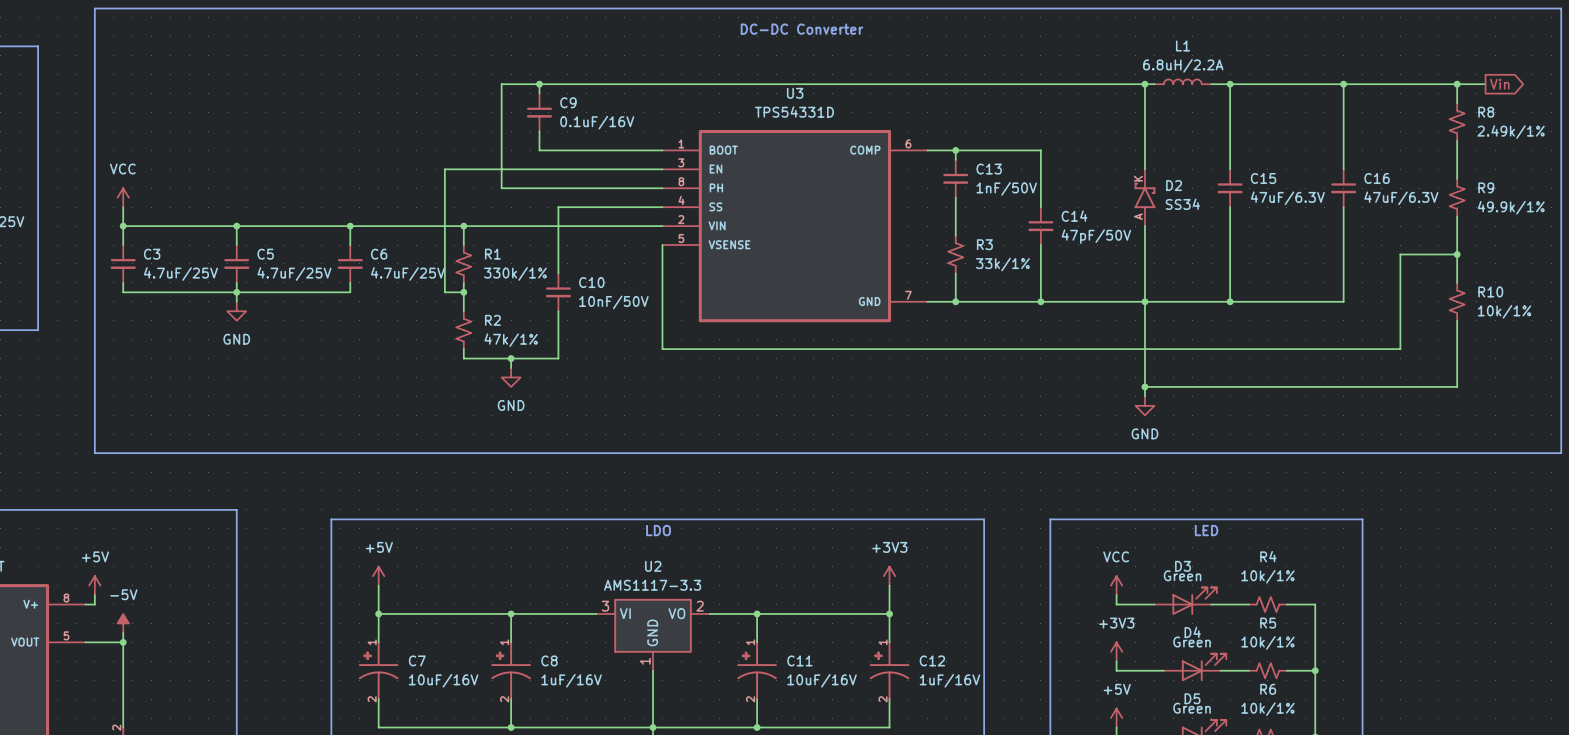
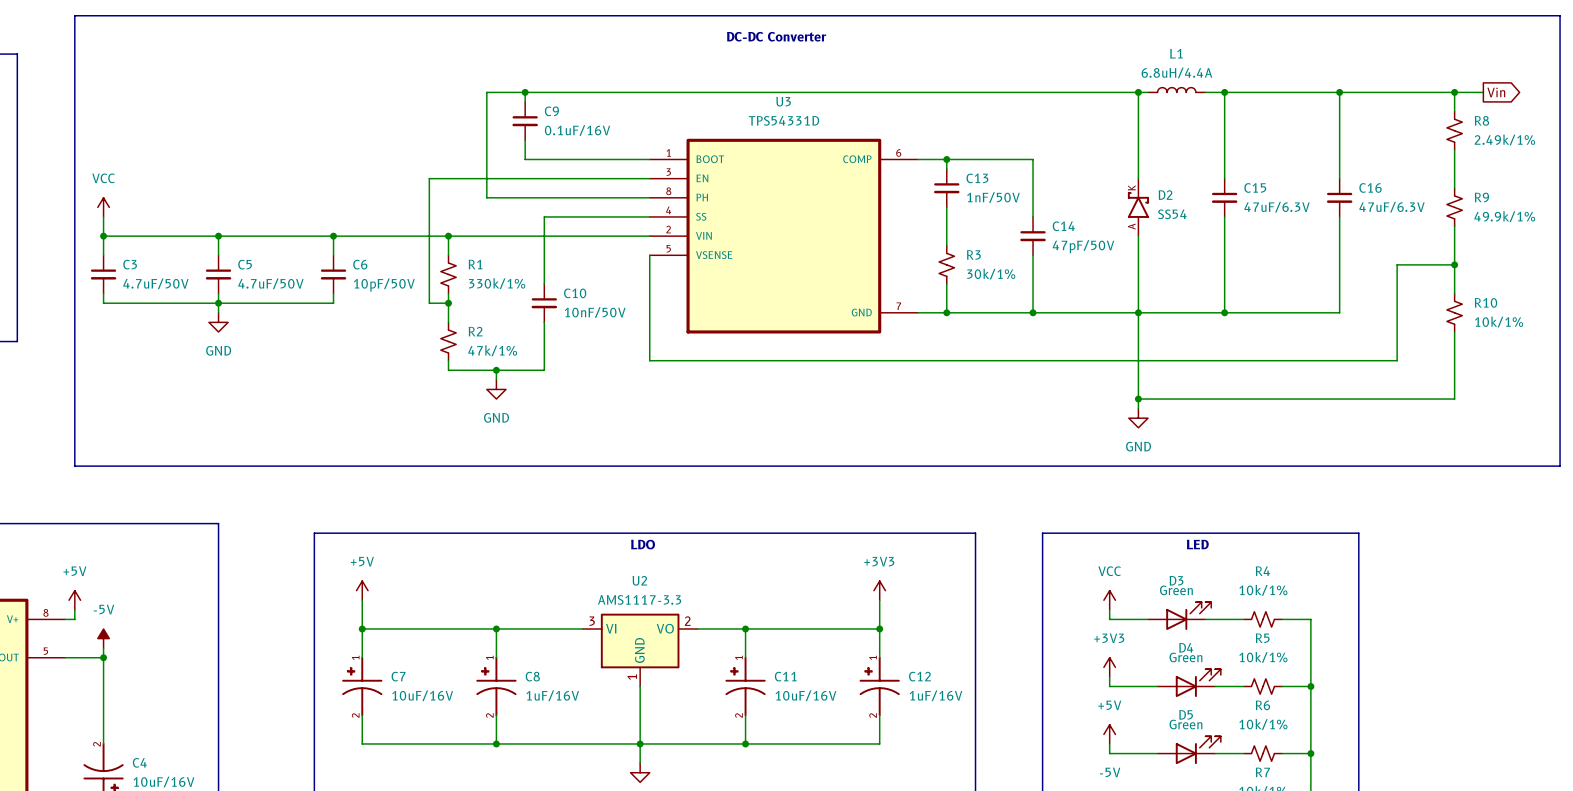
L1 value: 6.8uH/2.2A (1183, 65) -> 6.8uH/4.4A (1176, 72)
D2 value: SS34 (1182, 204) -> SS54 (1172, 214)
R3 value: 33k/1% (1002, 264) -> 30k/1% (991, 274)
C3 value: 4.7uF/25V (180, 274) -> 4.7uF/50V (155, 283)
C5 value: 4.7uF/25V (294, 274) -> 4.7uF/50V (270, 283)
C6 value: 4.7uF/25V (408, 274) -> 10pF/50V (384, 285)

